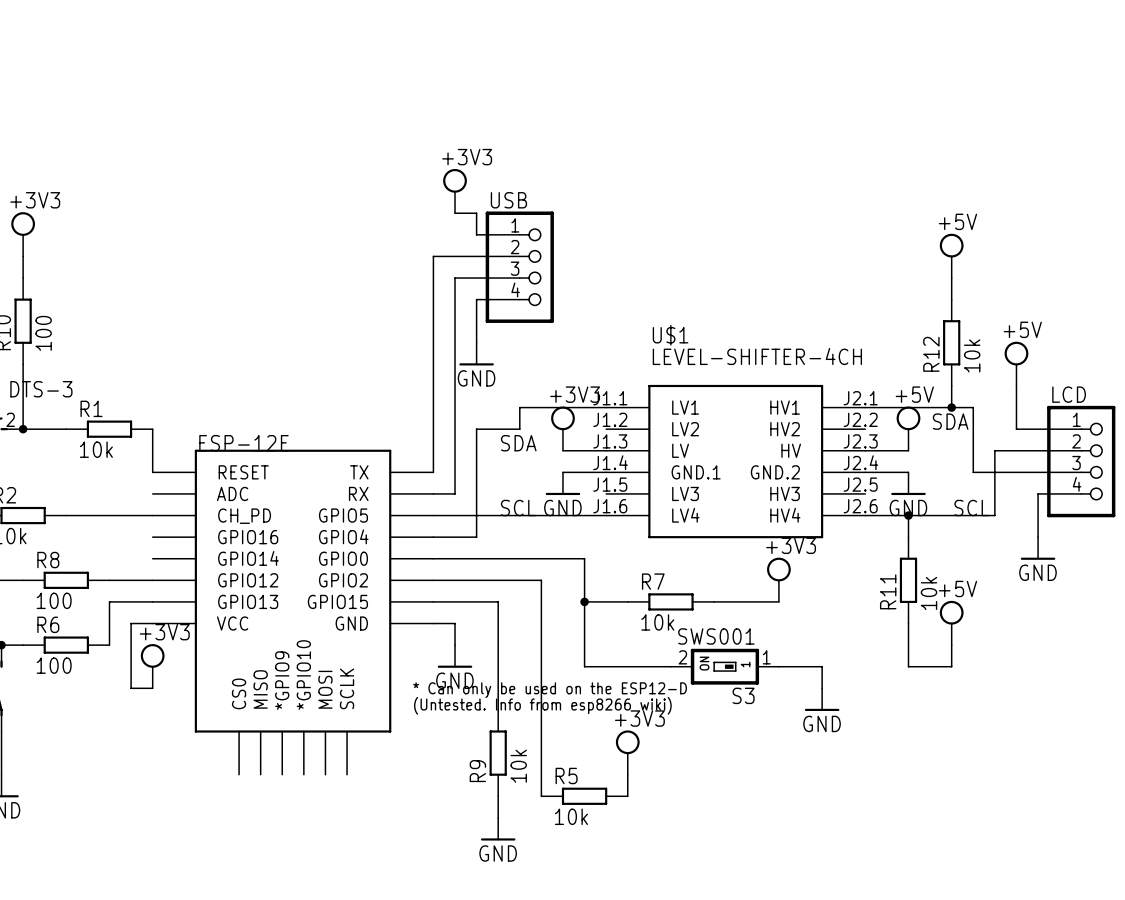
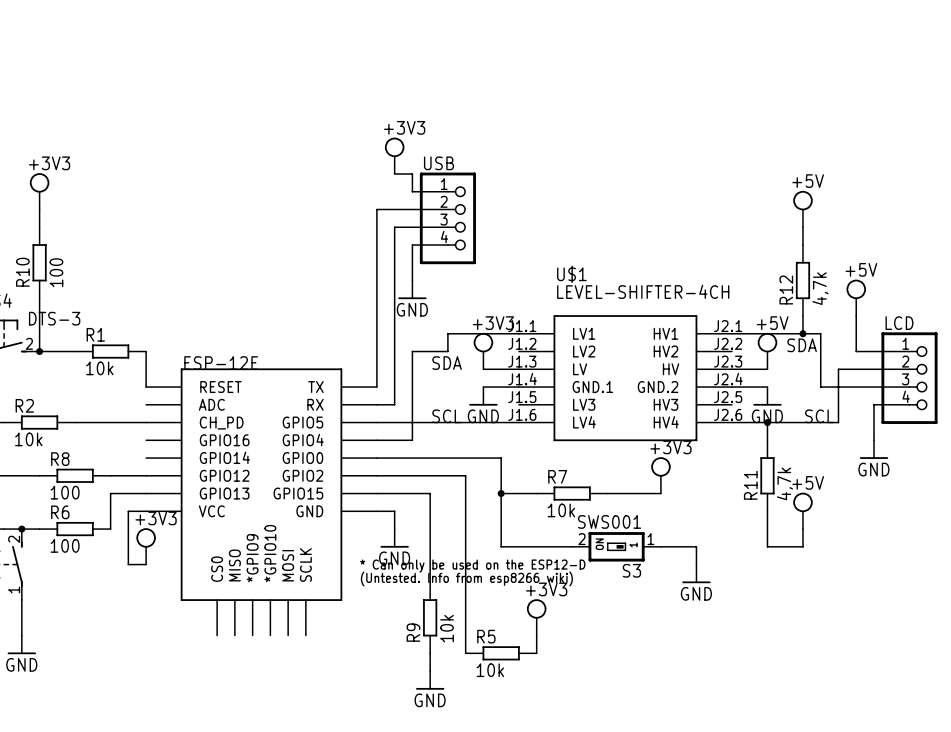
R12 value: 10k (972, 355) -> 4,7k (820, 288)
R11 value: 10k (929, 593) -> 4,7k (784, 483)

